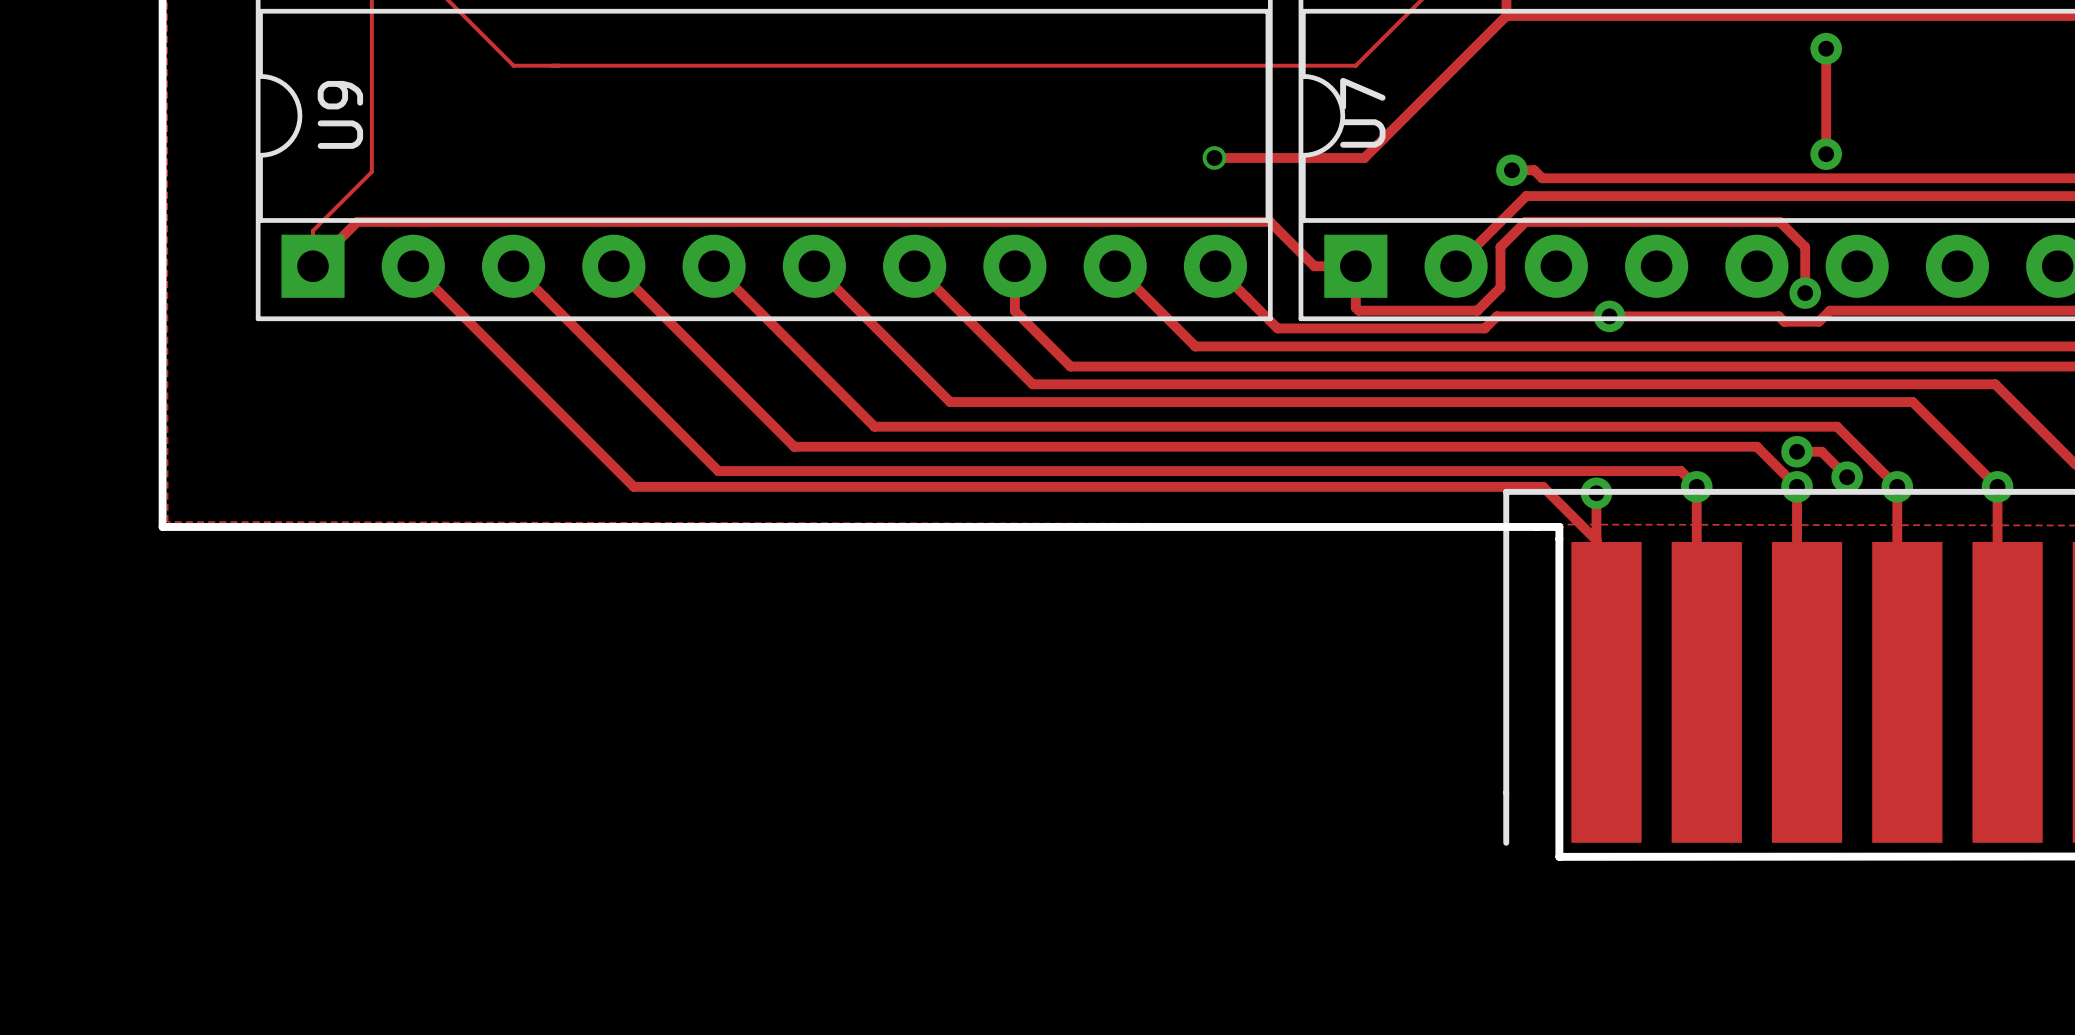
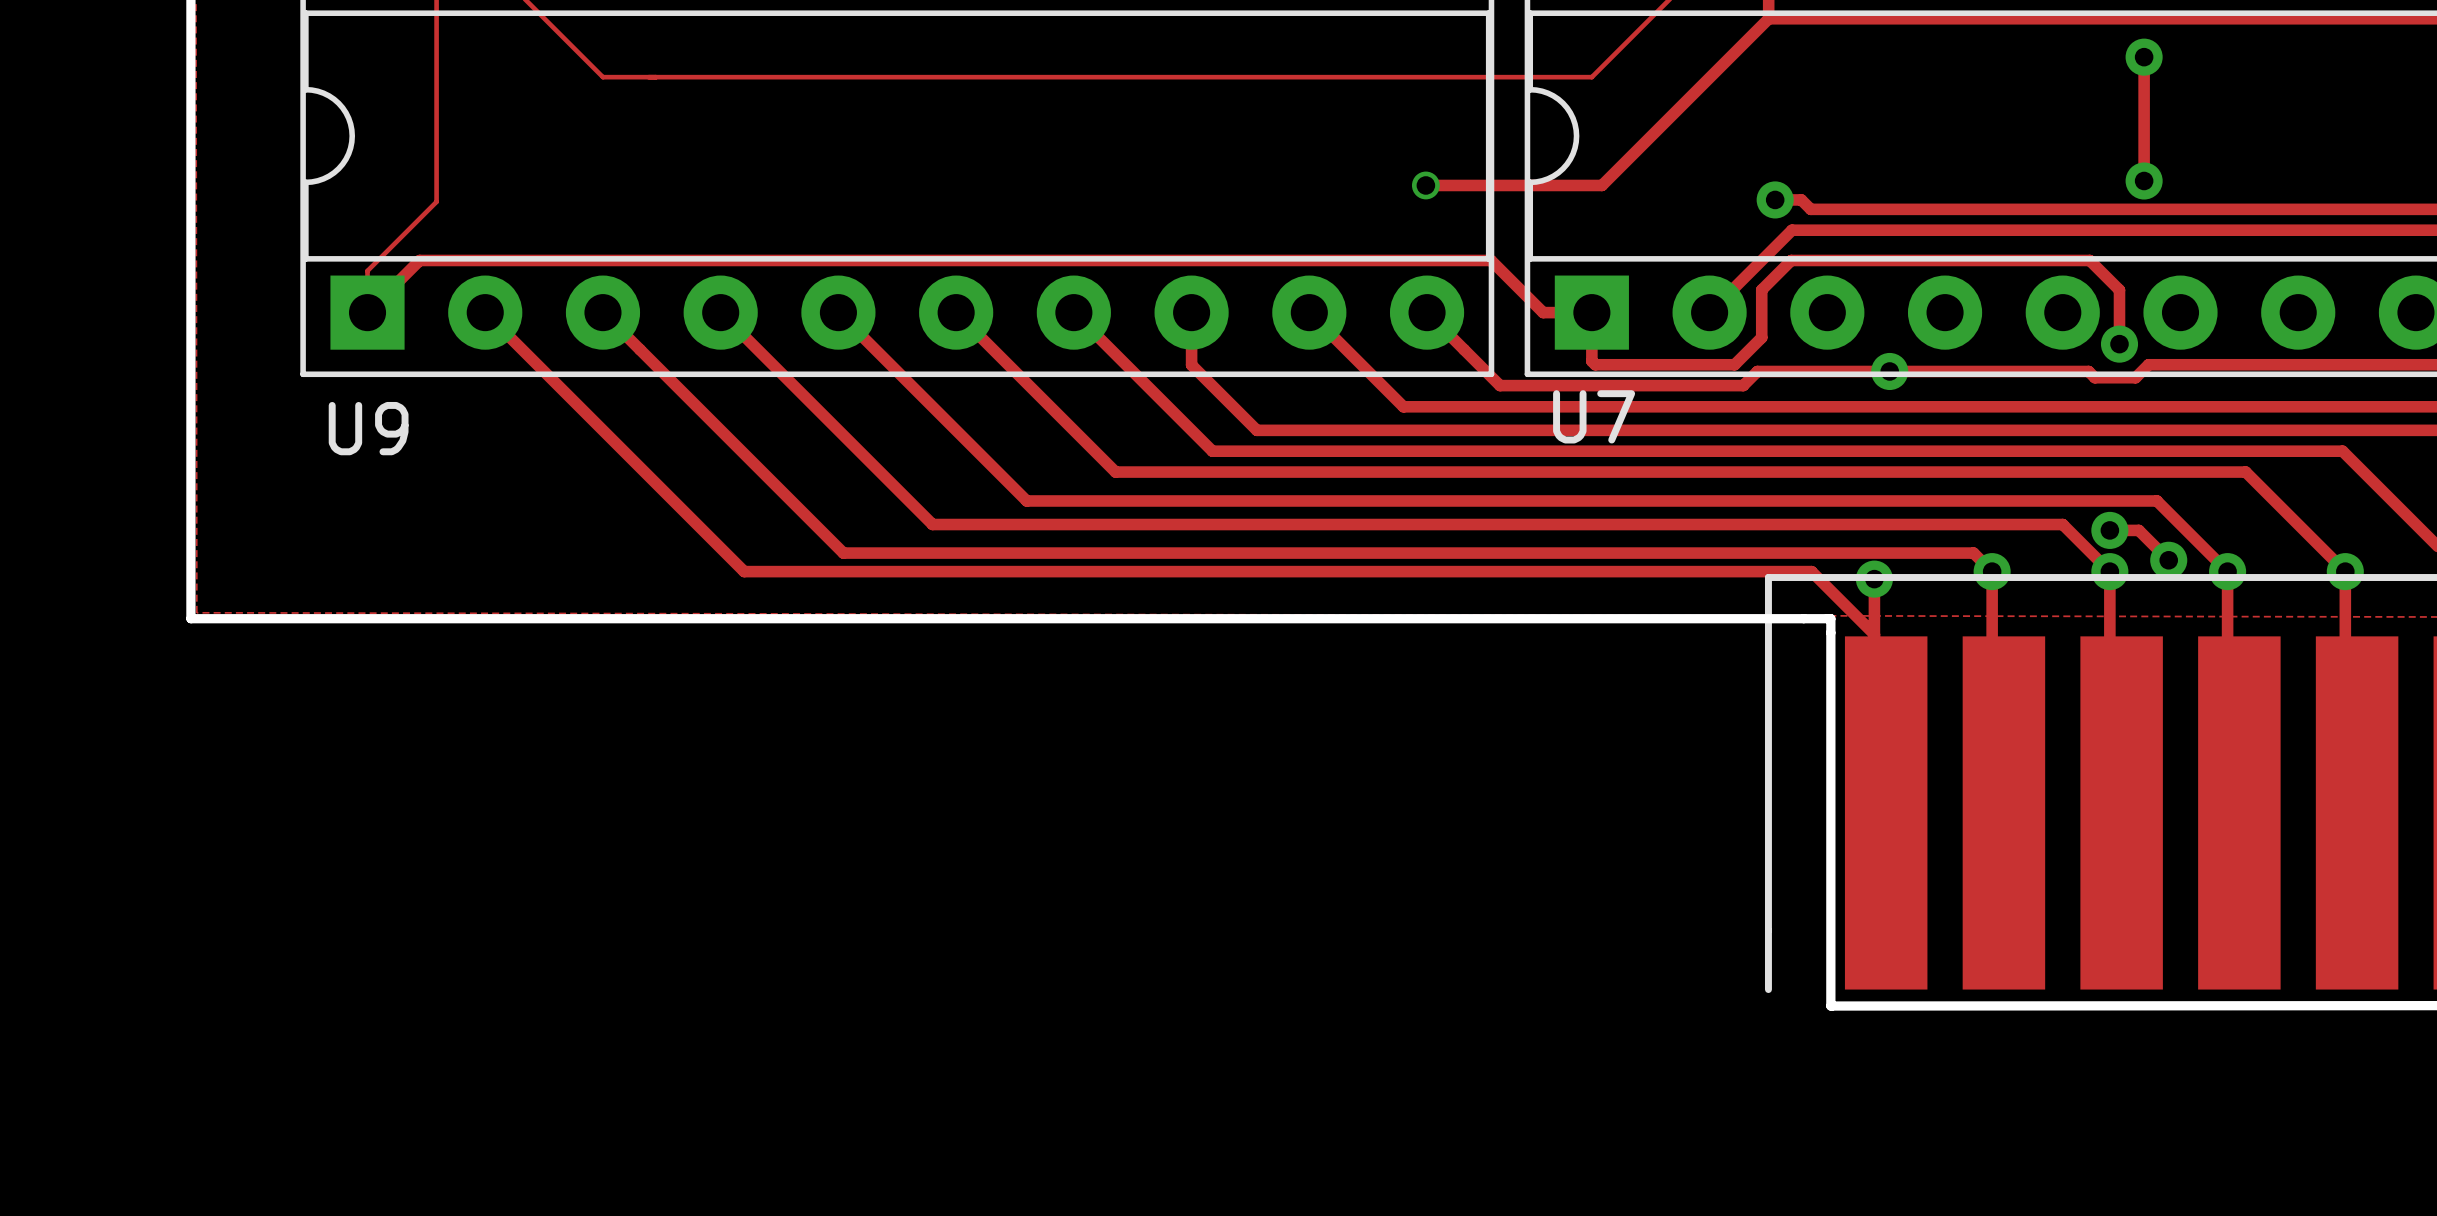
U7 name rotation: 0° (1362, 112) -> 90° clockwise (1594, 416)
U7 name position: U7 (1362, 112) -> U7 (1594, 416)
U9 name rotation: 0° (340, 114) -> 90° clockwise (368, 428)
U9 name position: U9 (340, 114) -> U9 (368, 428)

